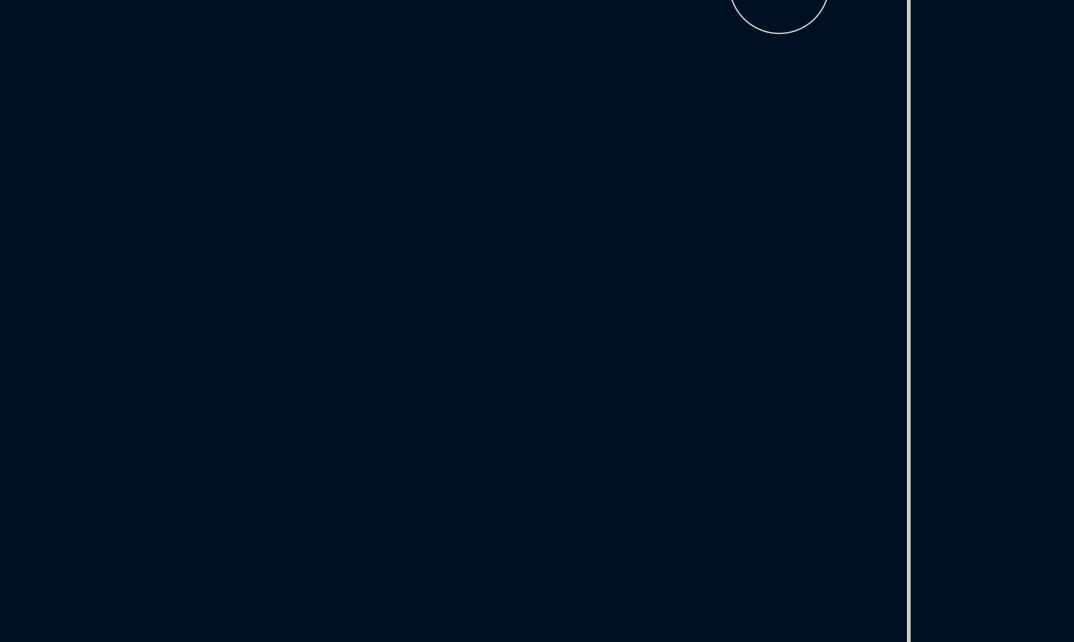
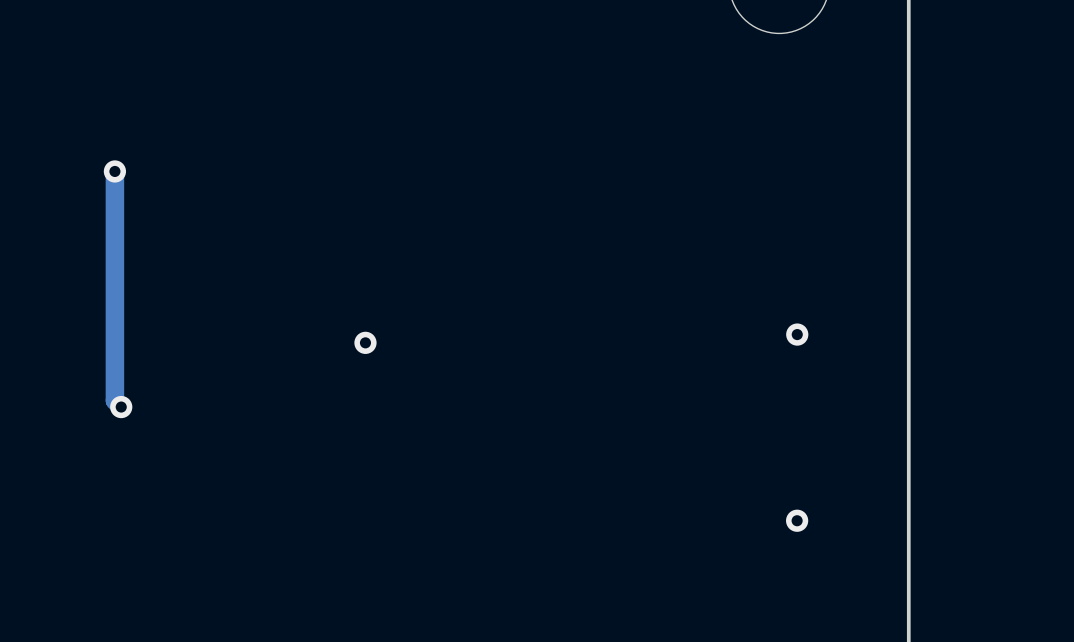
track: none -> (114, 171) (114, 400) (121, 407)
via: none -> (114, 171)
via: none -> (797, 334)
via: none -> (365, 342)
via: none -> (121, 407)
via: none -> (797, 520)

